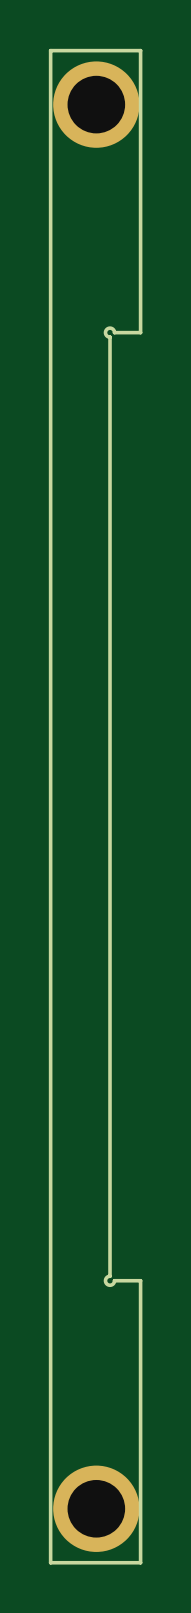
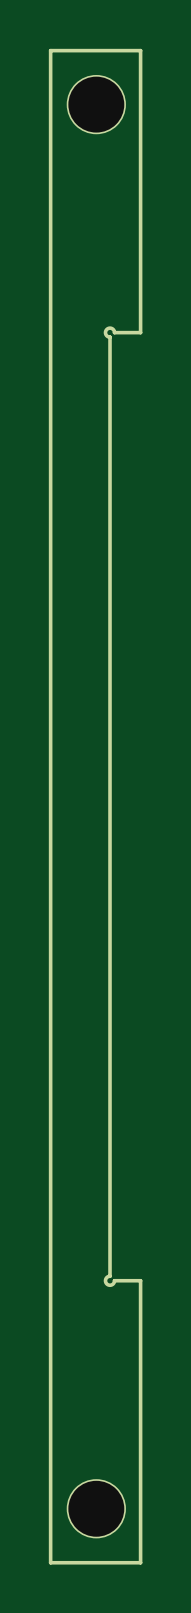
part footprint: [53, 61, 140, 148] -> [67, 75, 126, 134]
part footprint: [53, 1465, 140, 1552] -> [67, 1479, 126, 1538]

